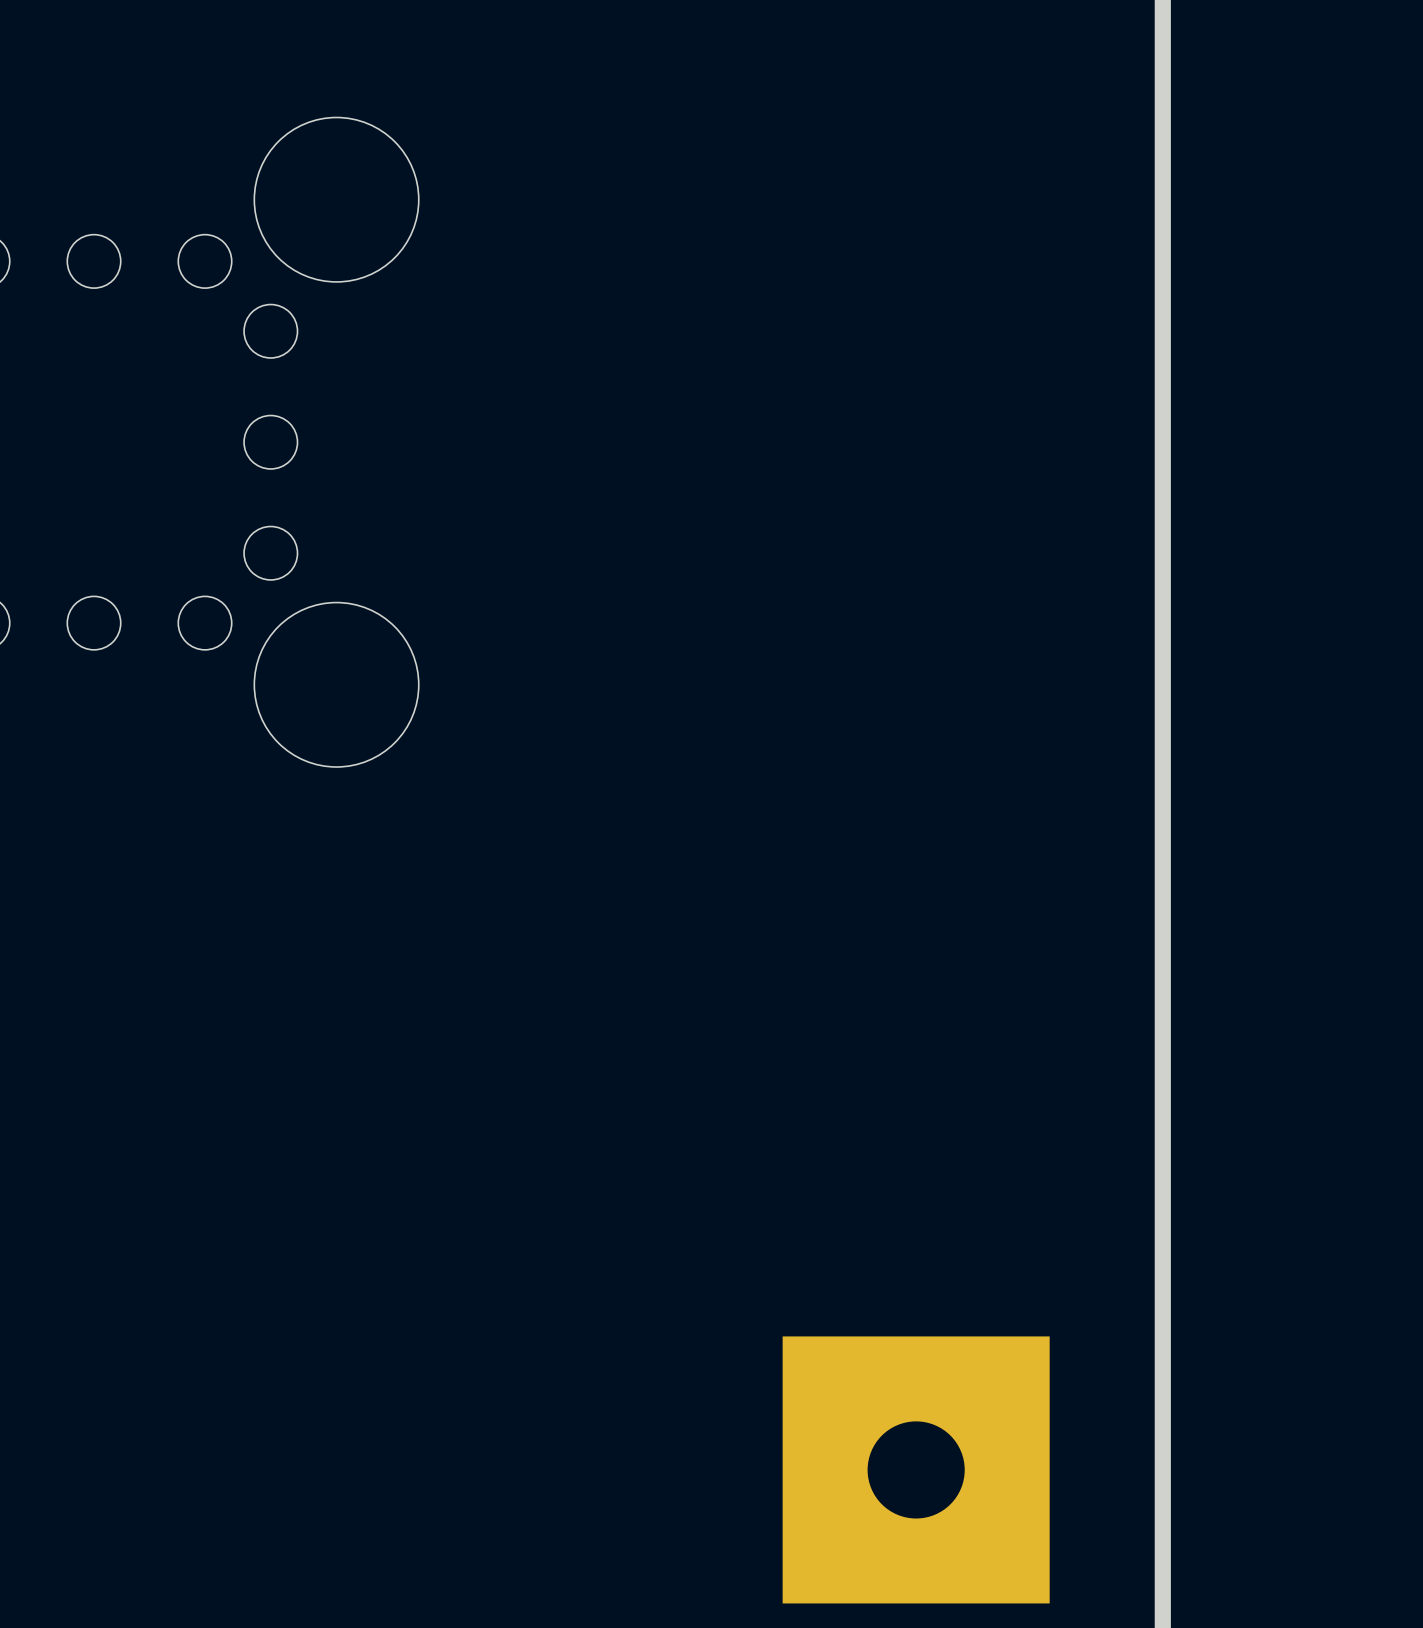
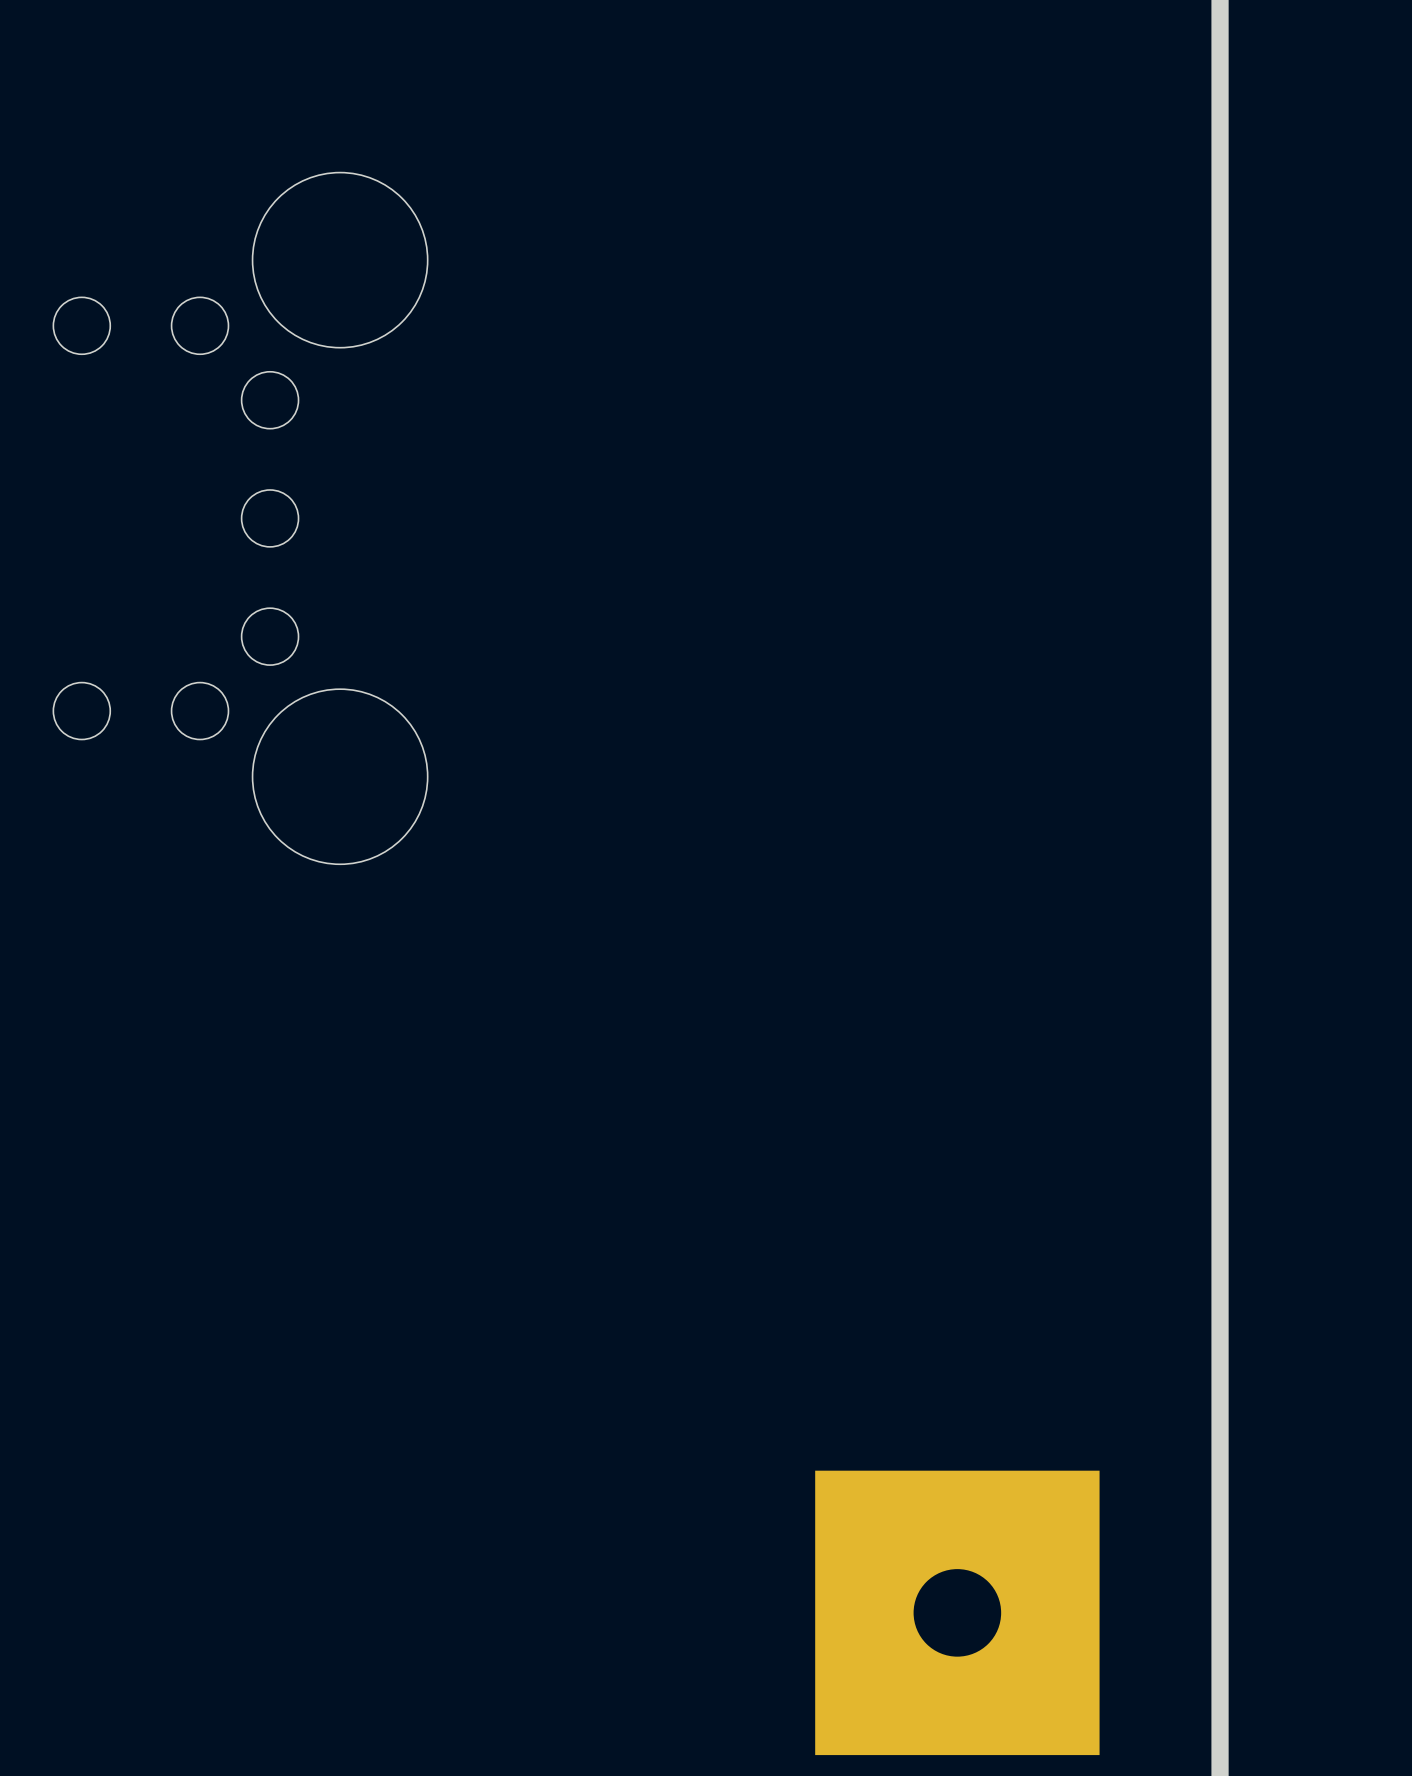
part footprint: [782, 1336, 1050, 1604] -> [815, 1470, 1100, 1756]

